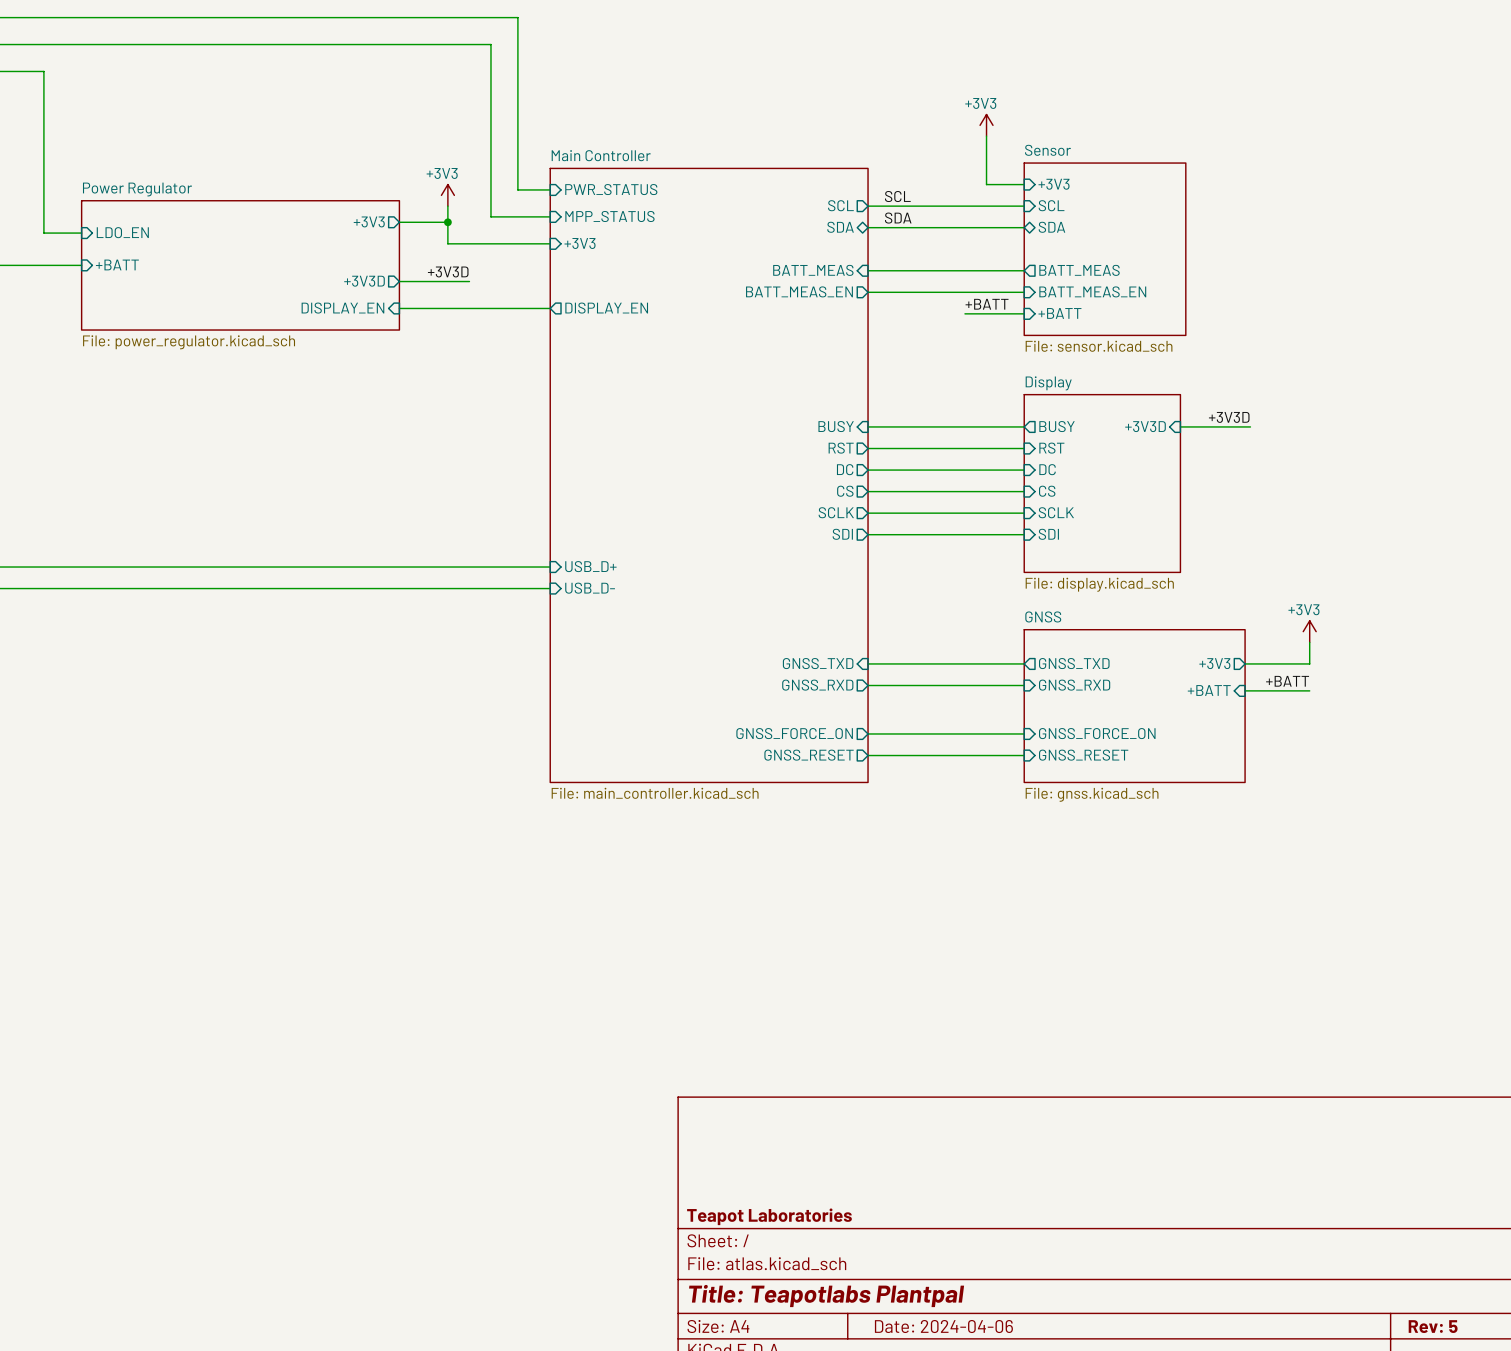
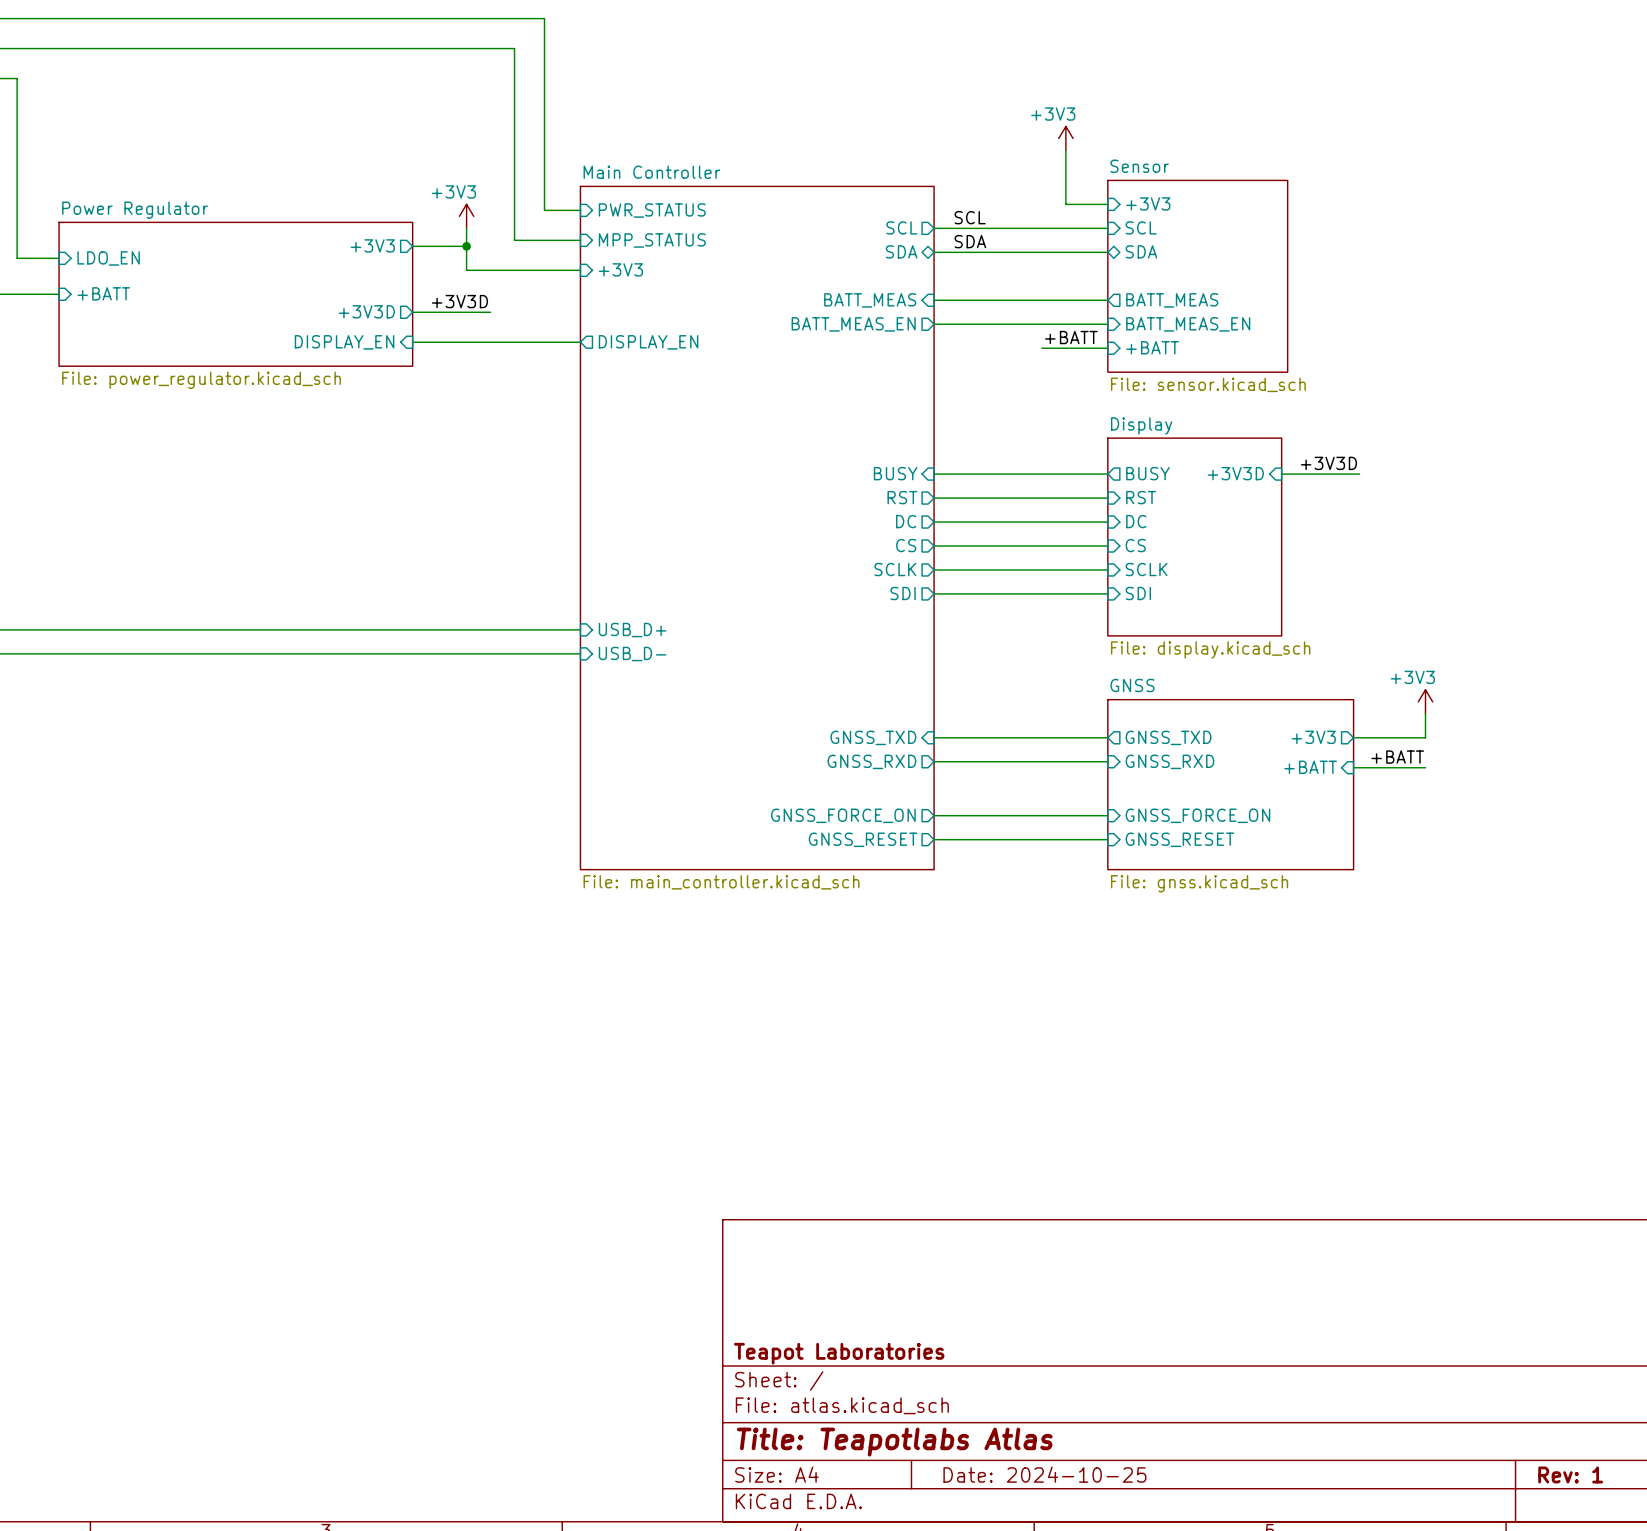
title block: Title: Teapotlabs Plantpal (826, 1296) -> Title: Teapotlabs Atlas (894, 1442)
title block: Date: 2024-04-06 (943, 1326) -> Date: 2024-10-25 (1044, 1474)
title block: Rev: 5 (1433, 1326) -> Rev: 1 (1570, 1474)

